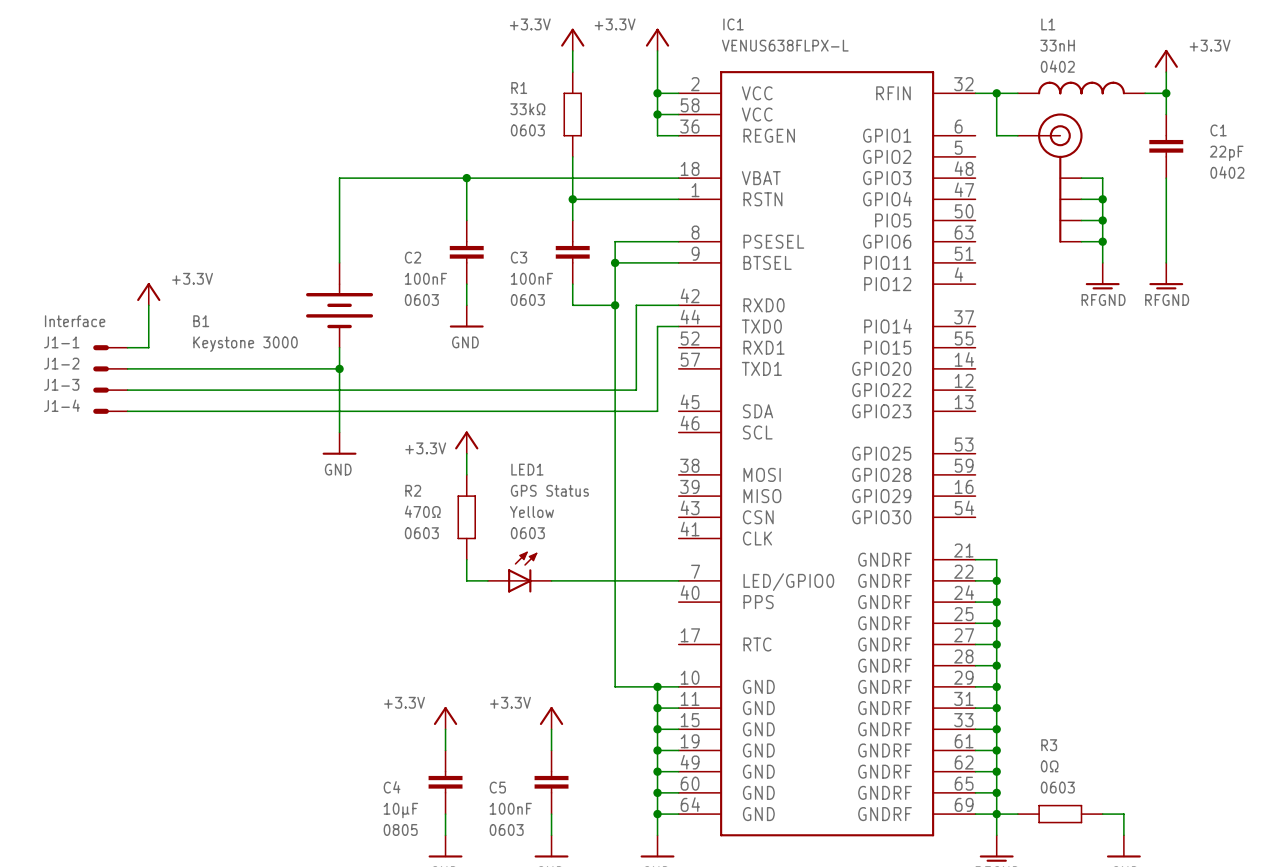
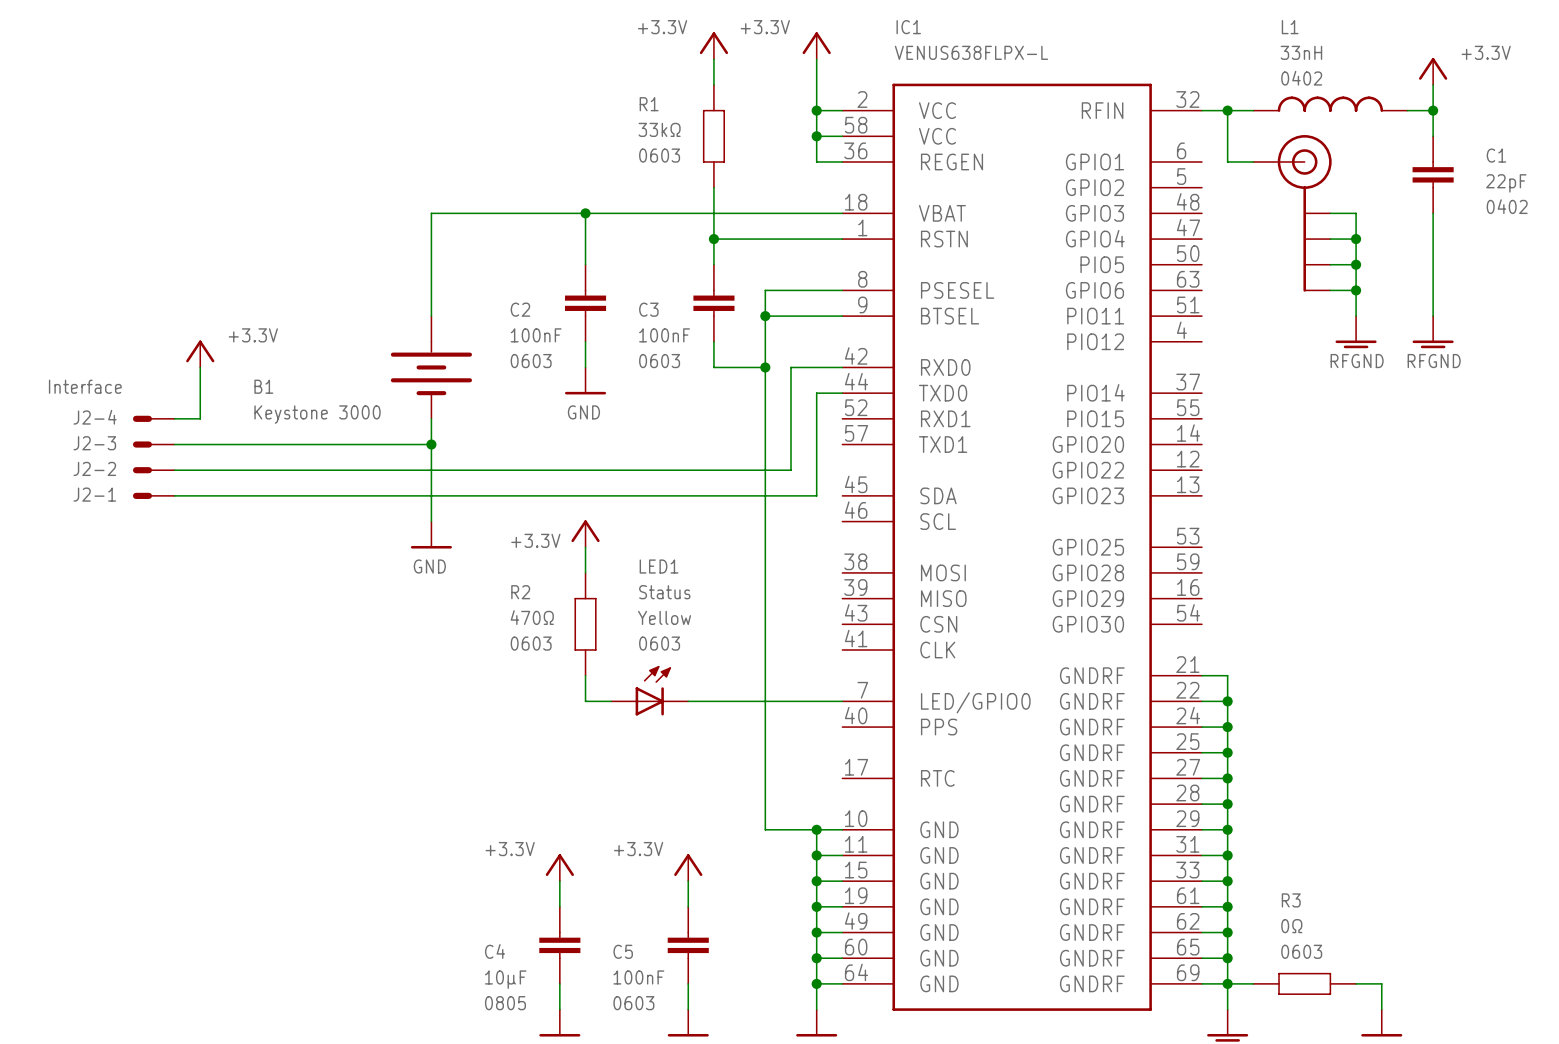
J1-4 value: none -> Interface (85, 386)
J1-1 value: Interface (75, 321) -> none
J1-1 name: J1-1 (61, 342) -> J2-4 (95, 417)
J1-2 name: J1-2 (61, 363) -> J2-3 (94, 443)
J1-3 name: J1-3 (61, 384) -> J2-2 (94, 468)
J1-4 name: J1-4 (61, 405) -> J2-1 (94, 494)
LED1 value: GPS Status (549, 490) -> Status (664, 592)

